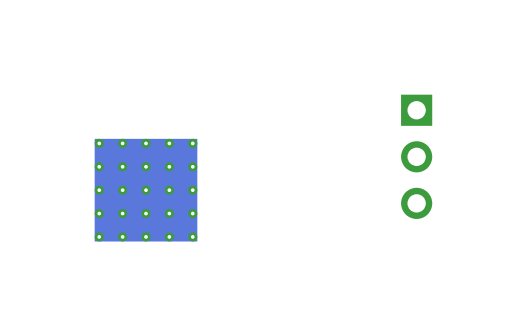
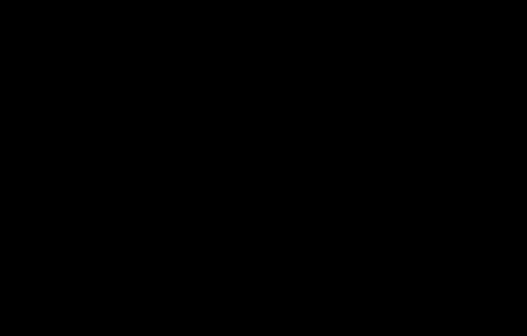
part: (416, 156) -> none
part: (146, 190) -> none

